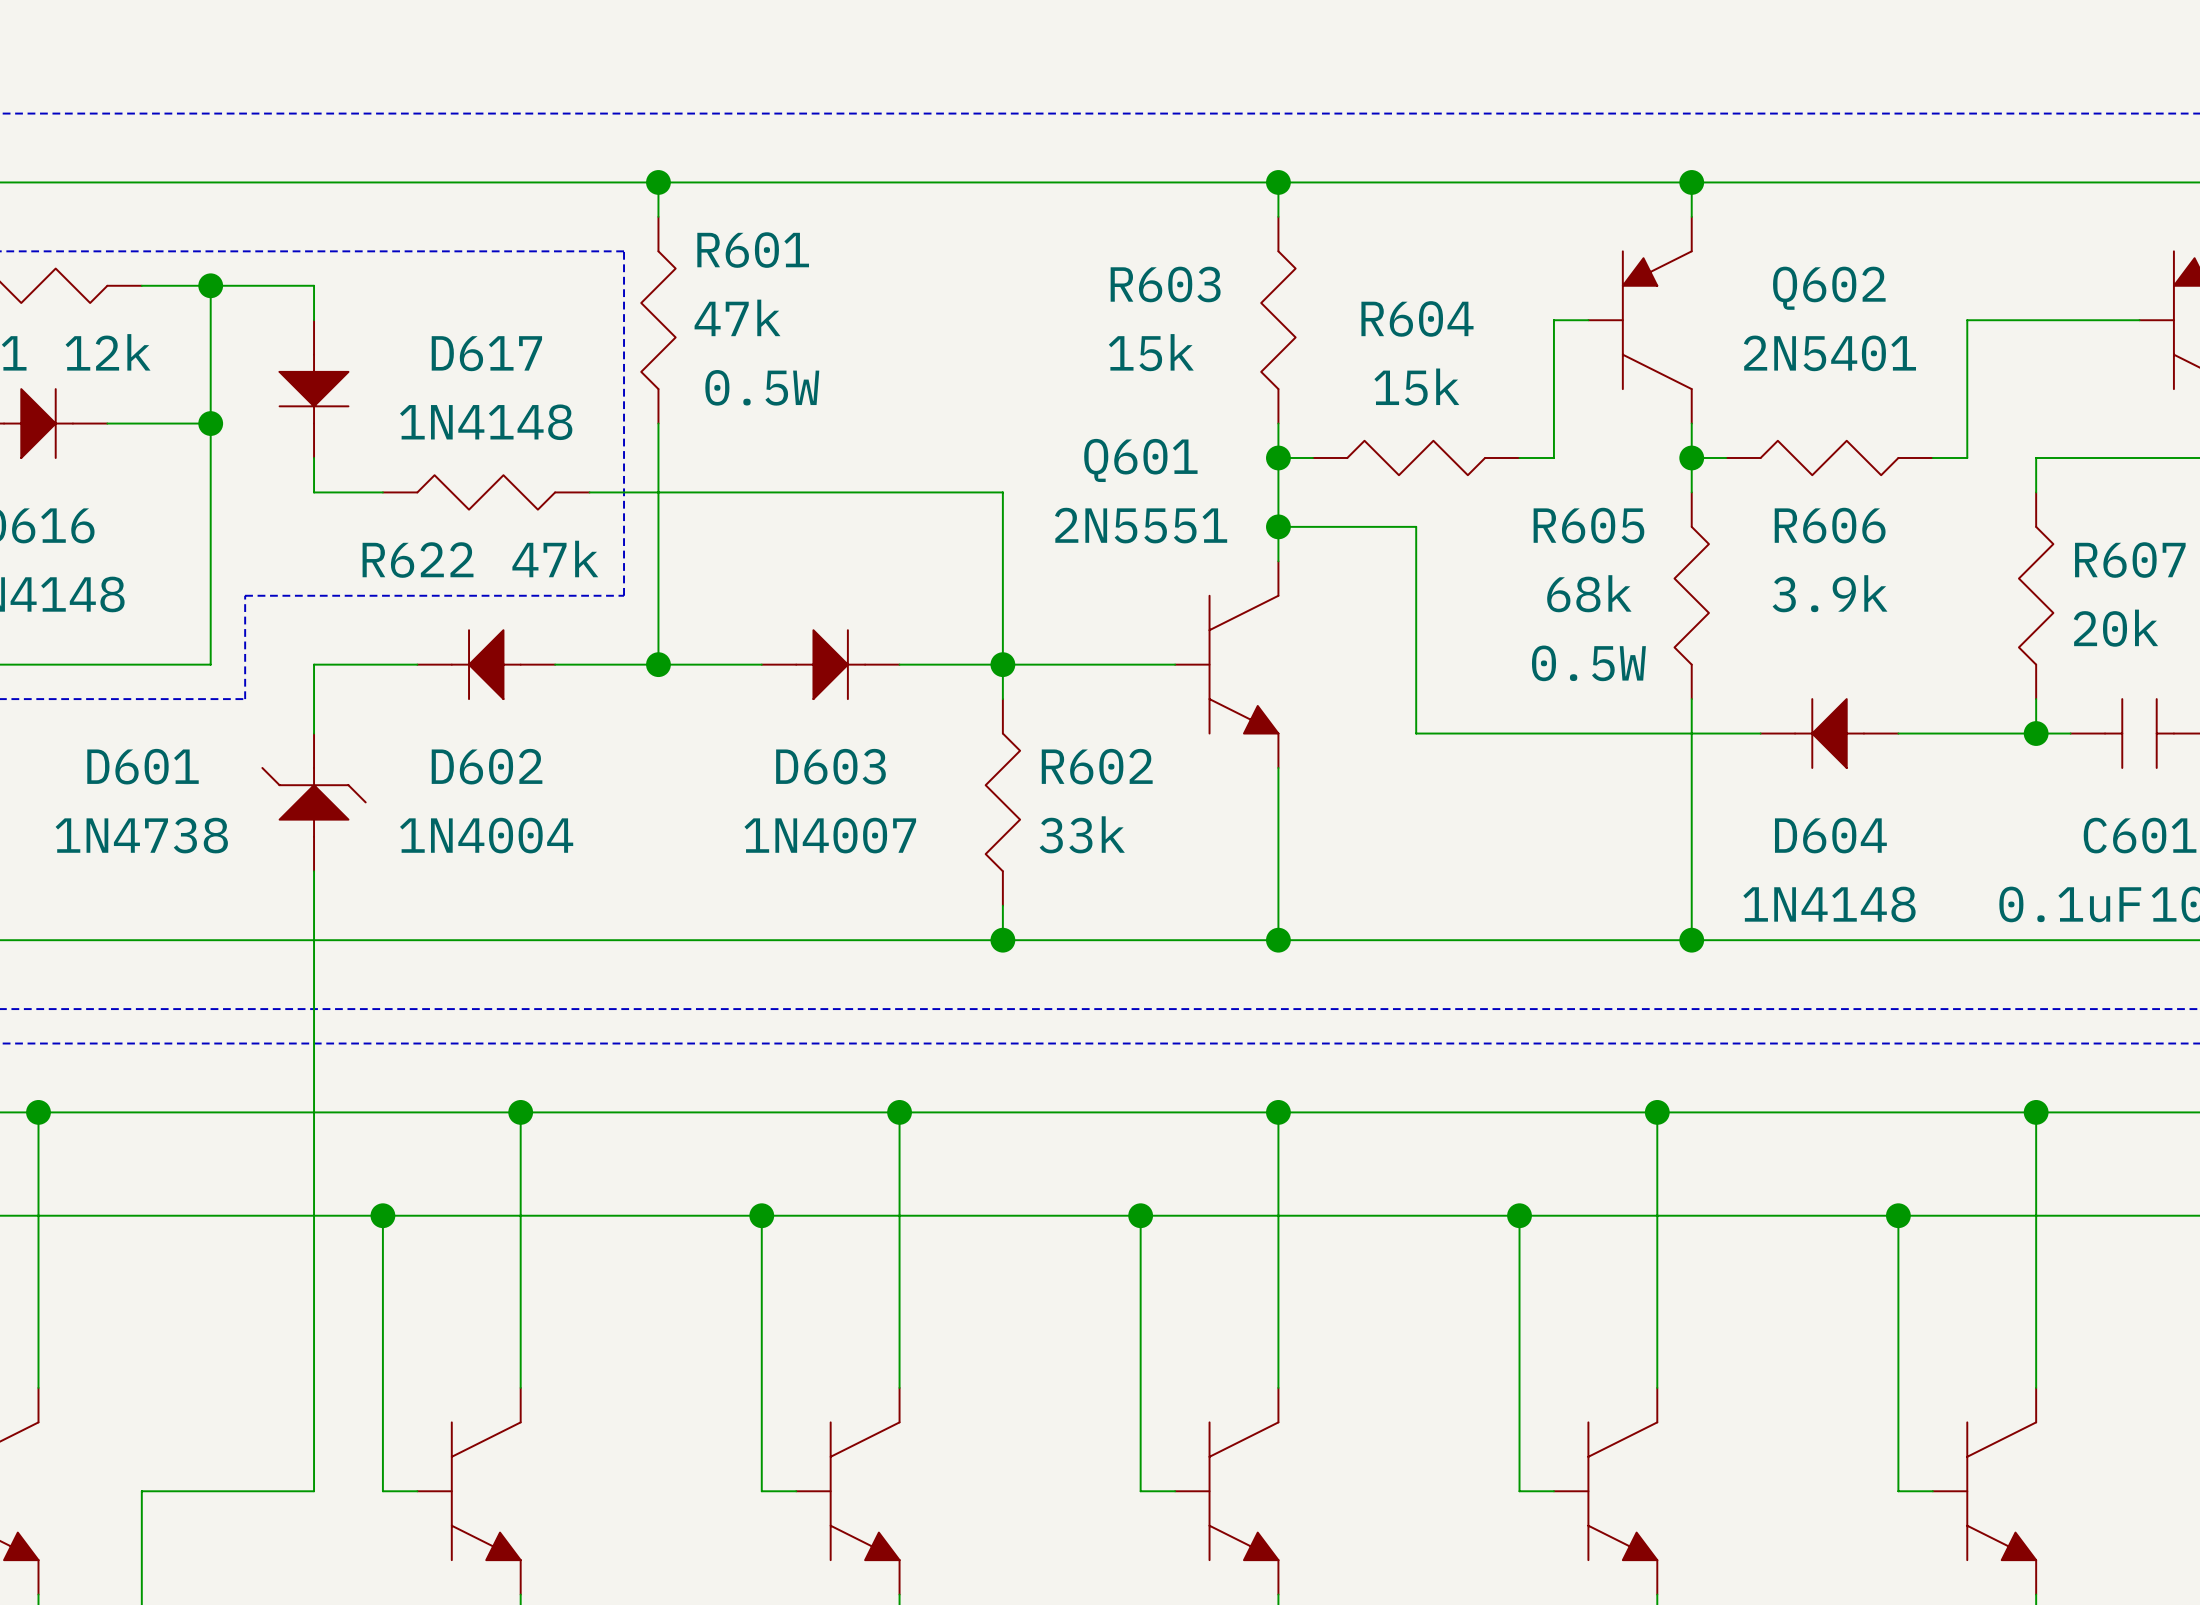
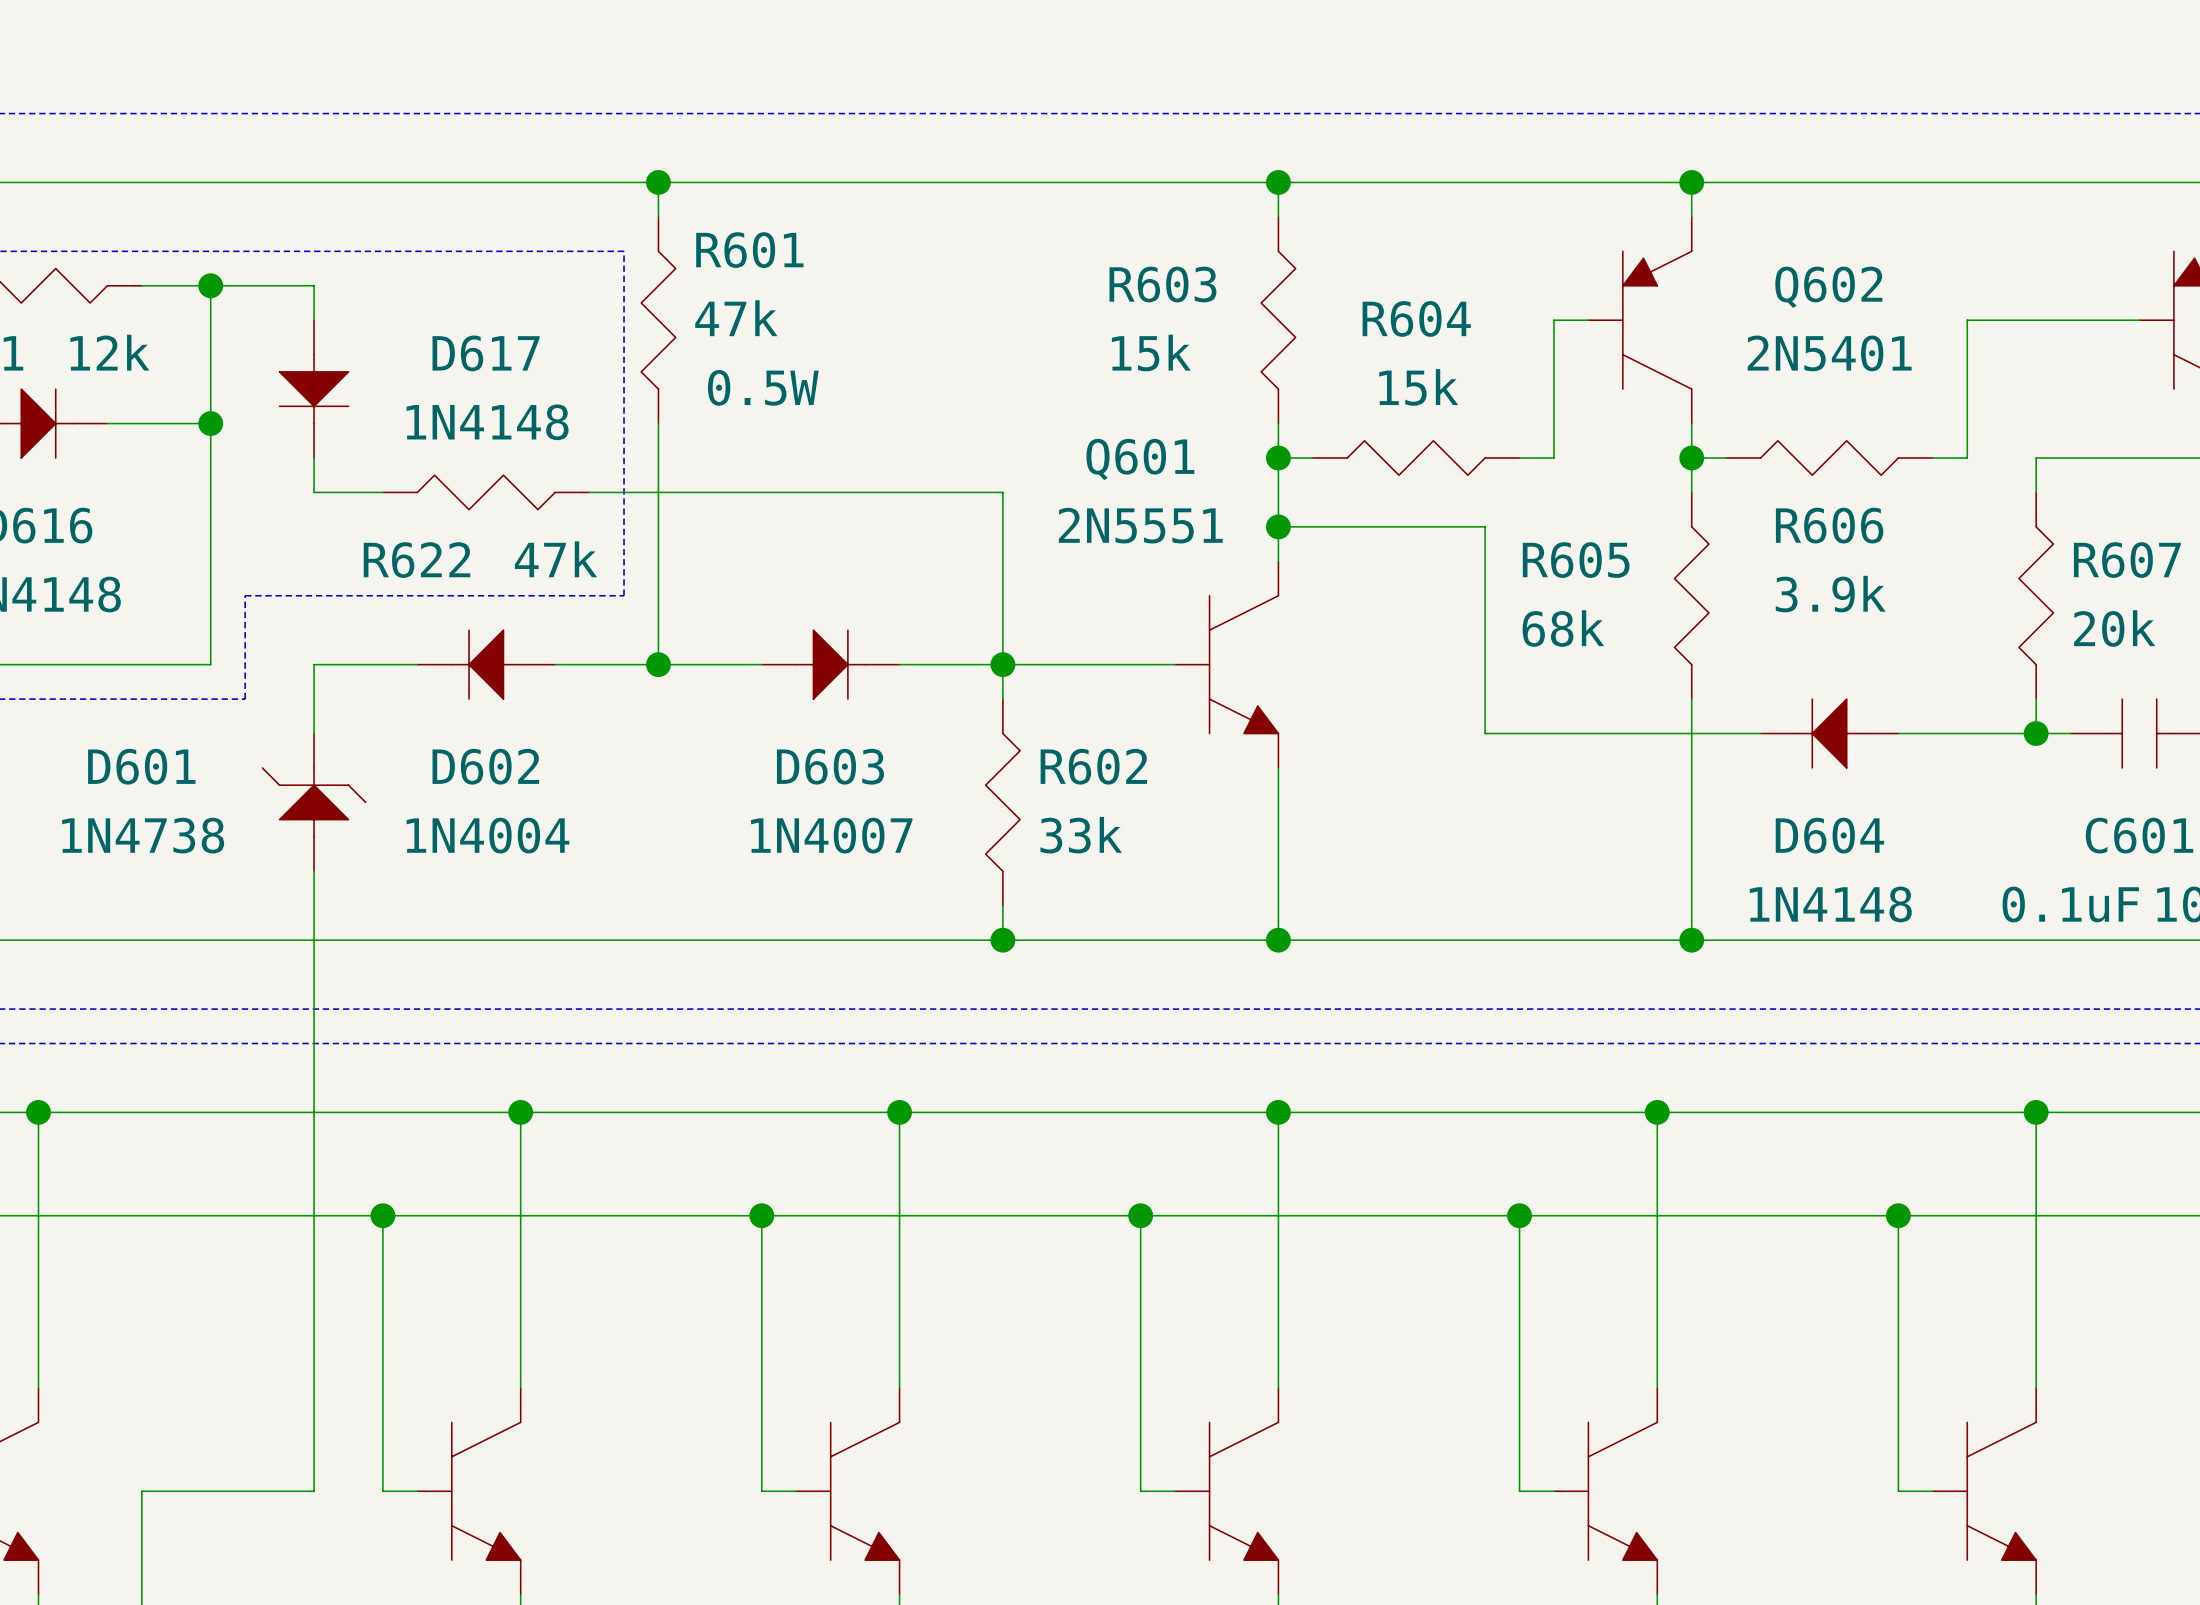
R605 name position: R605 (1588, 525) -> R605 (1576, 560)
wire: (1416, 526) (1416, 733) (1485, 733) -> (1416, 526) (1485, 526) (1485, 733)
R605 value position: 68k (1589, 593) -> 68k (1563, 628)
R605 text: 0.5W (1588, 663) -> none

